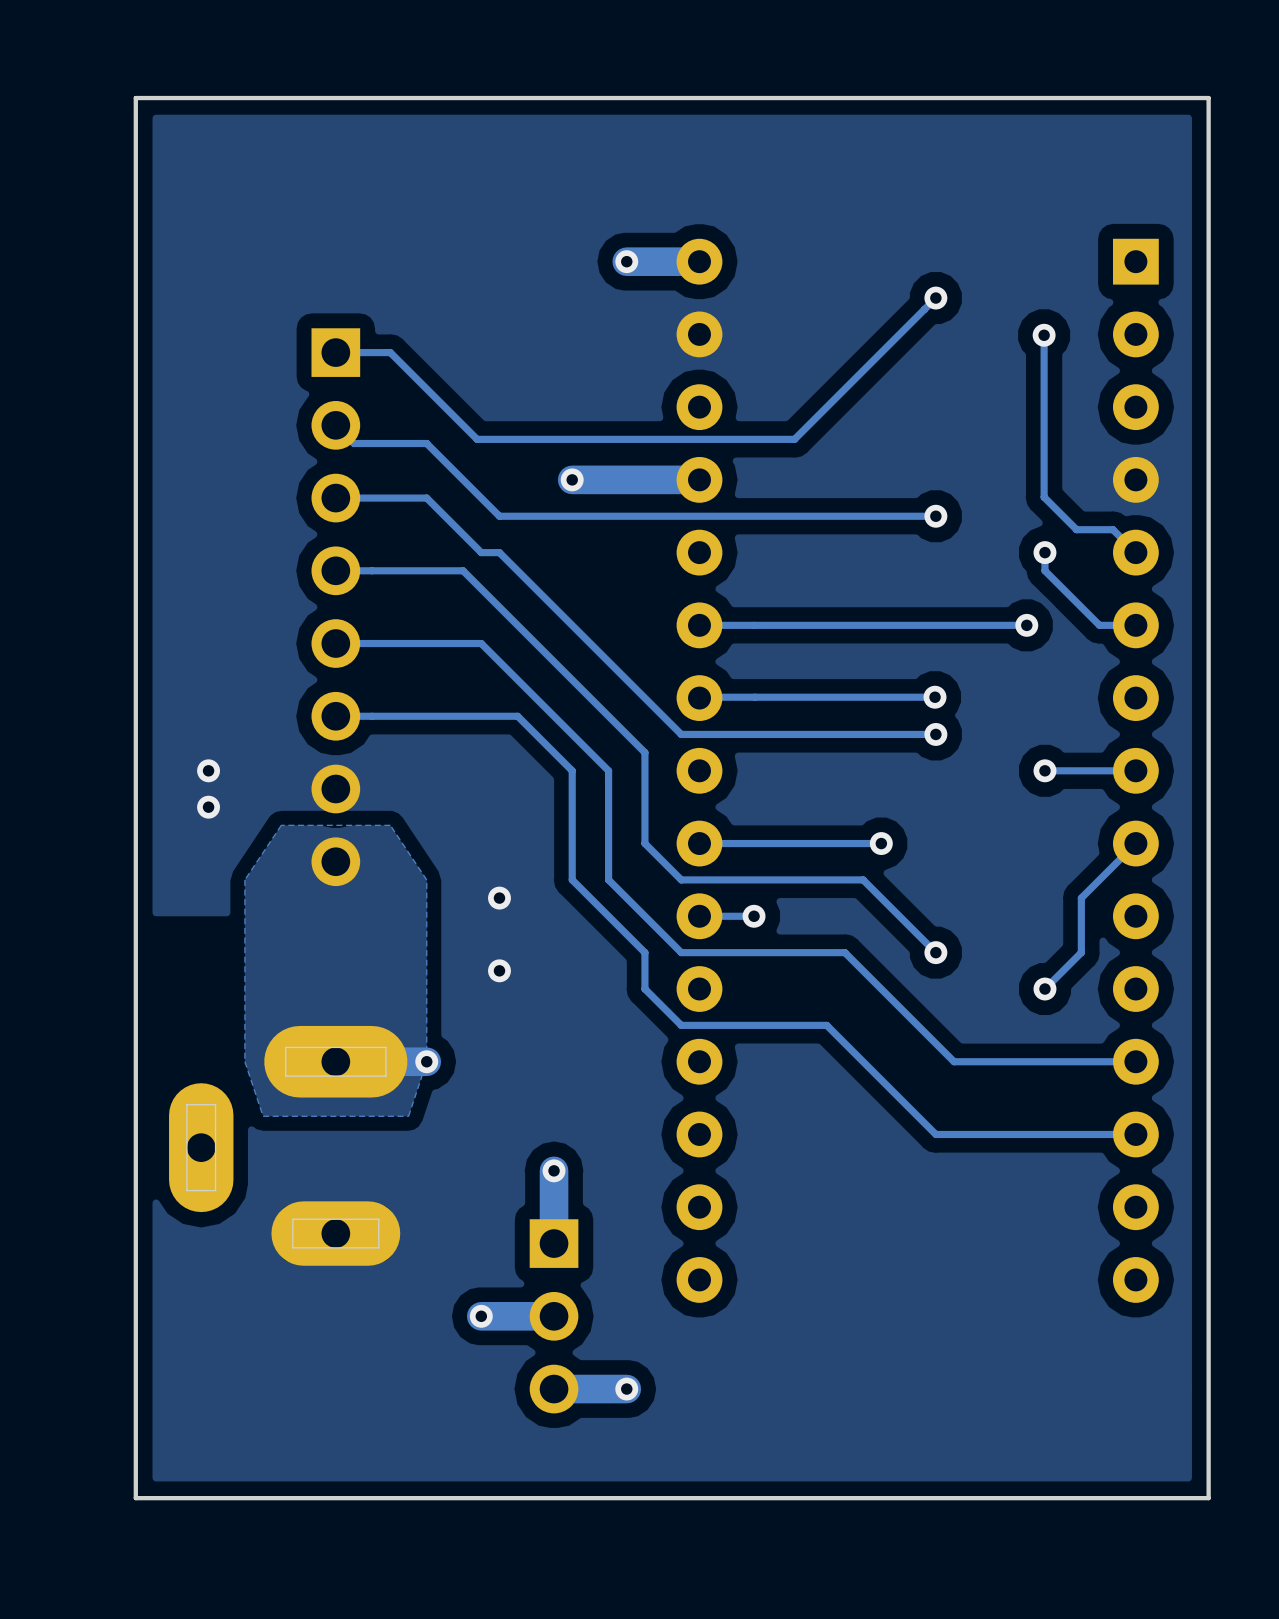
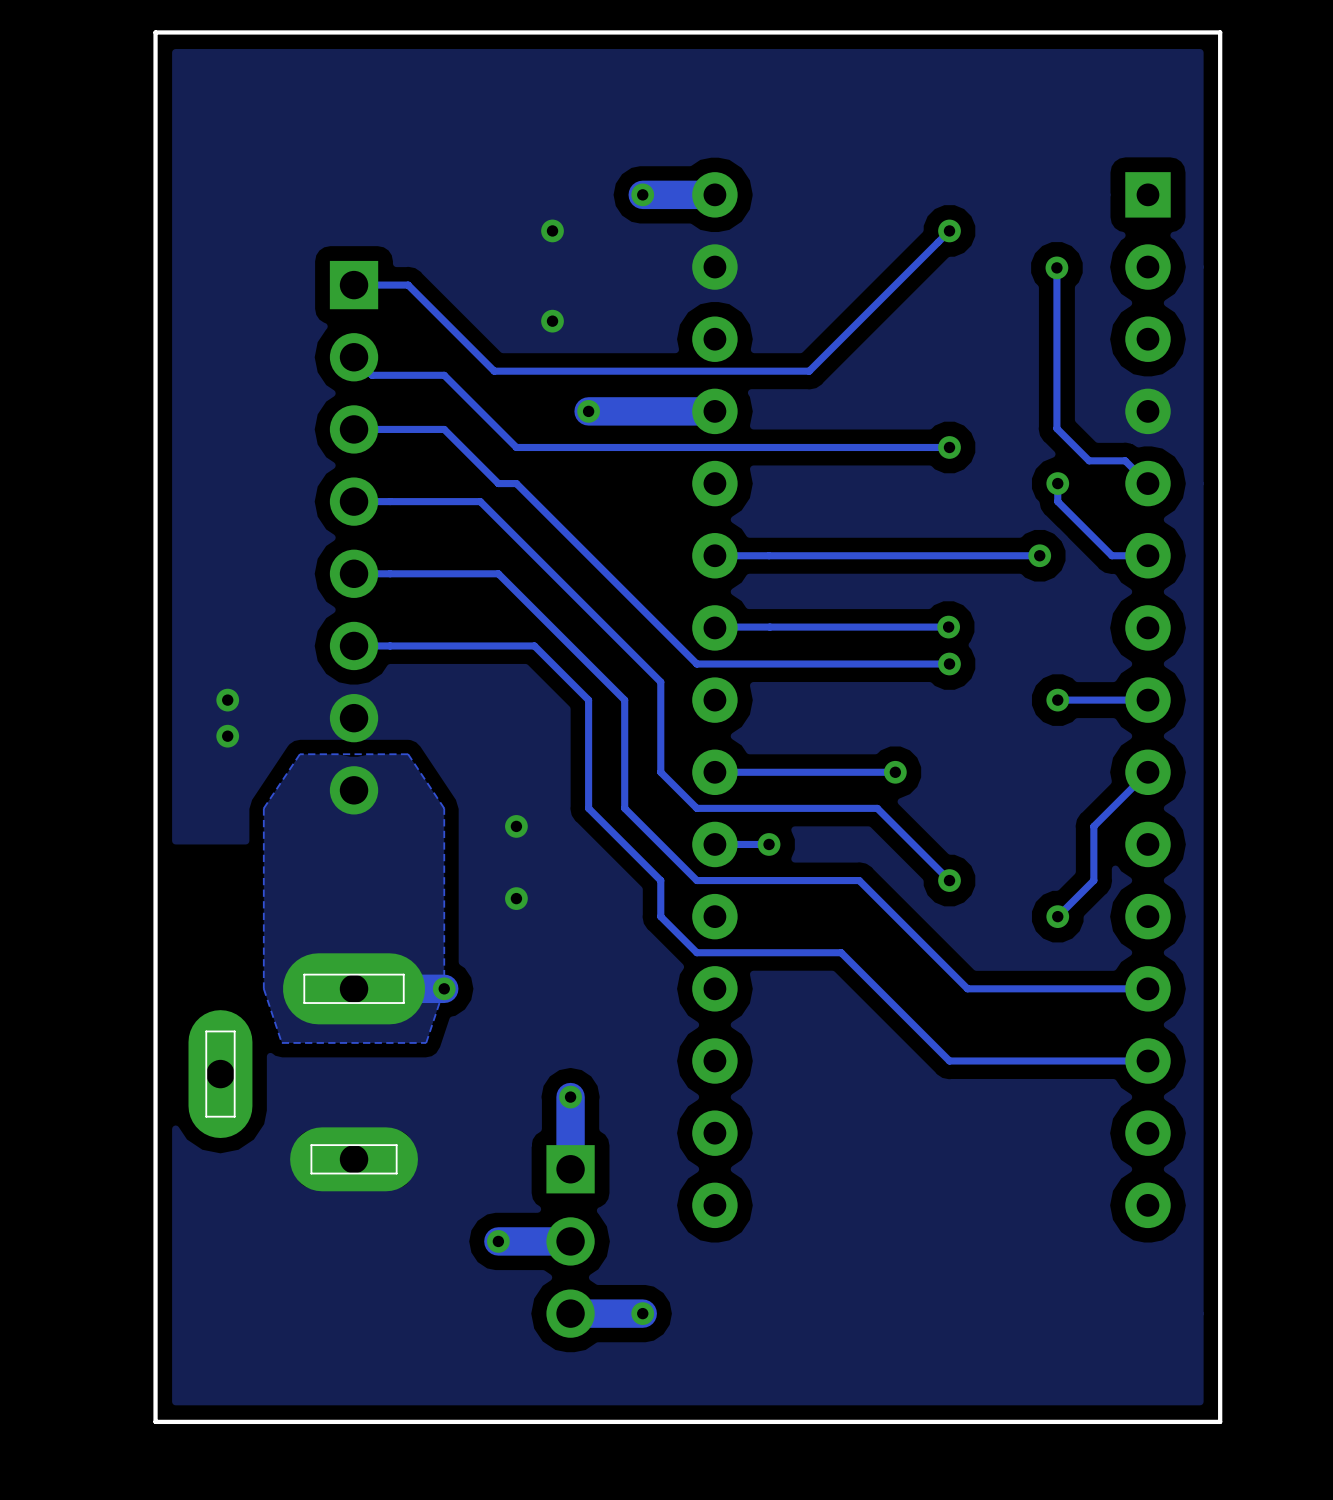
via: none -> (552, 230)
via: none -> (552, 321)

